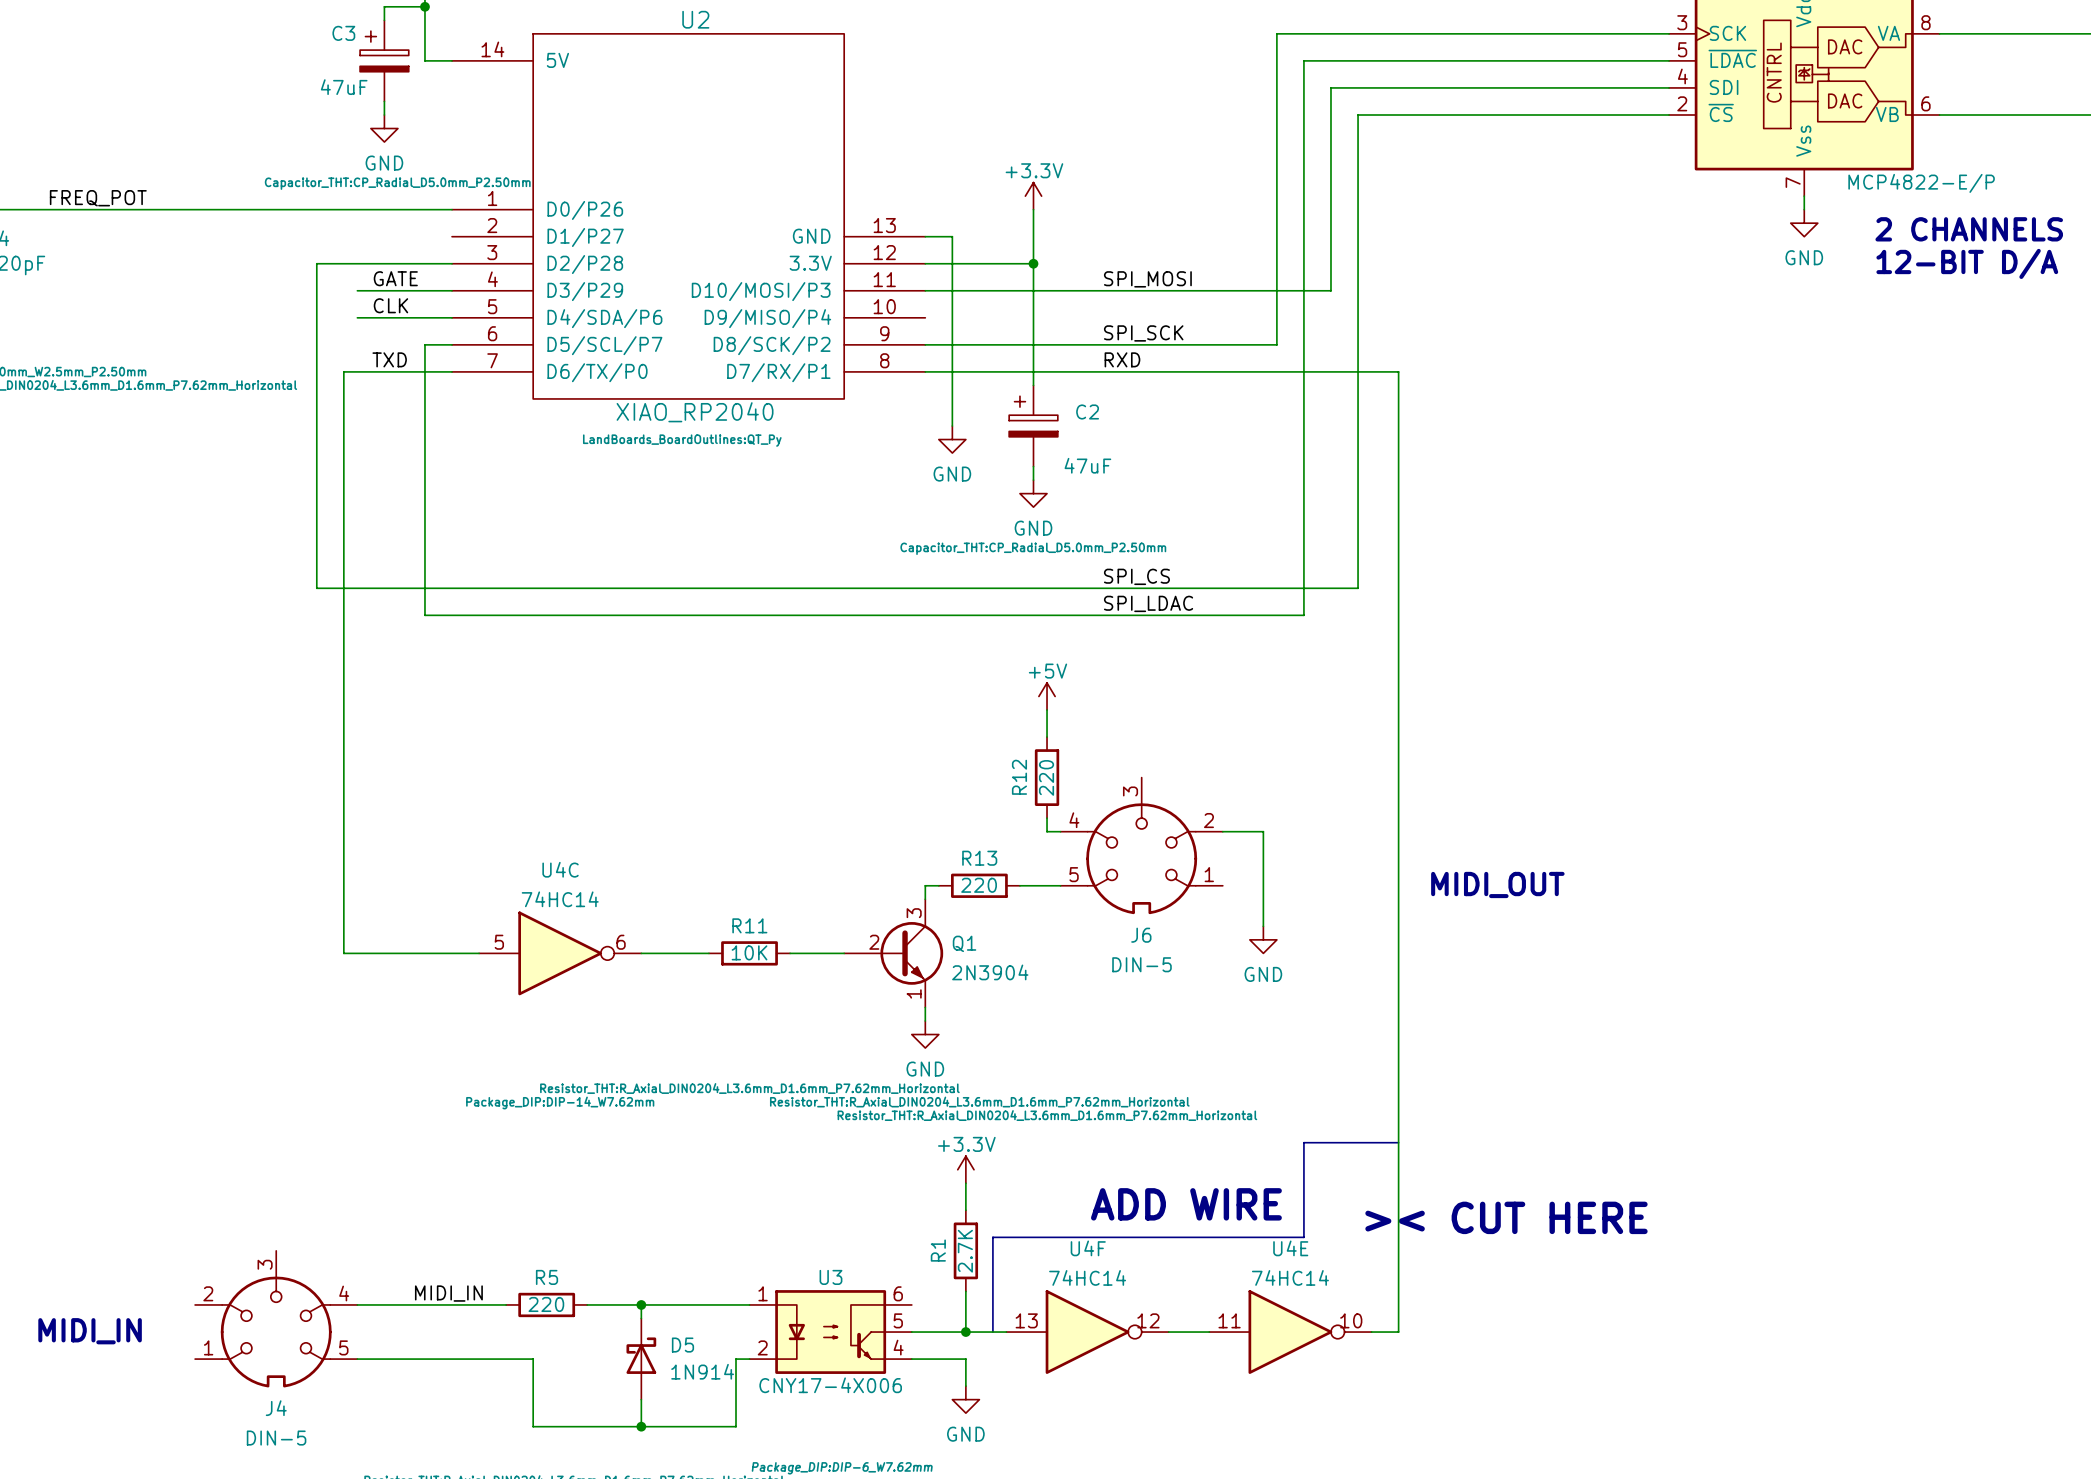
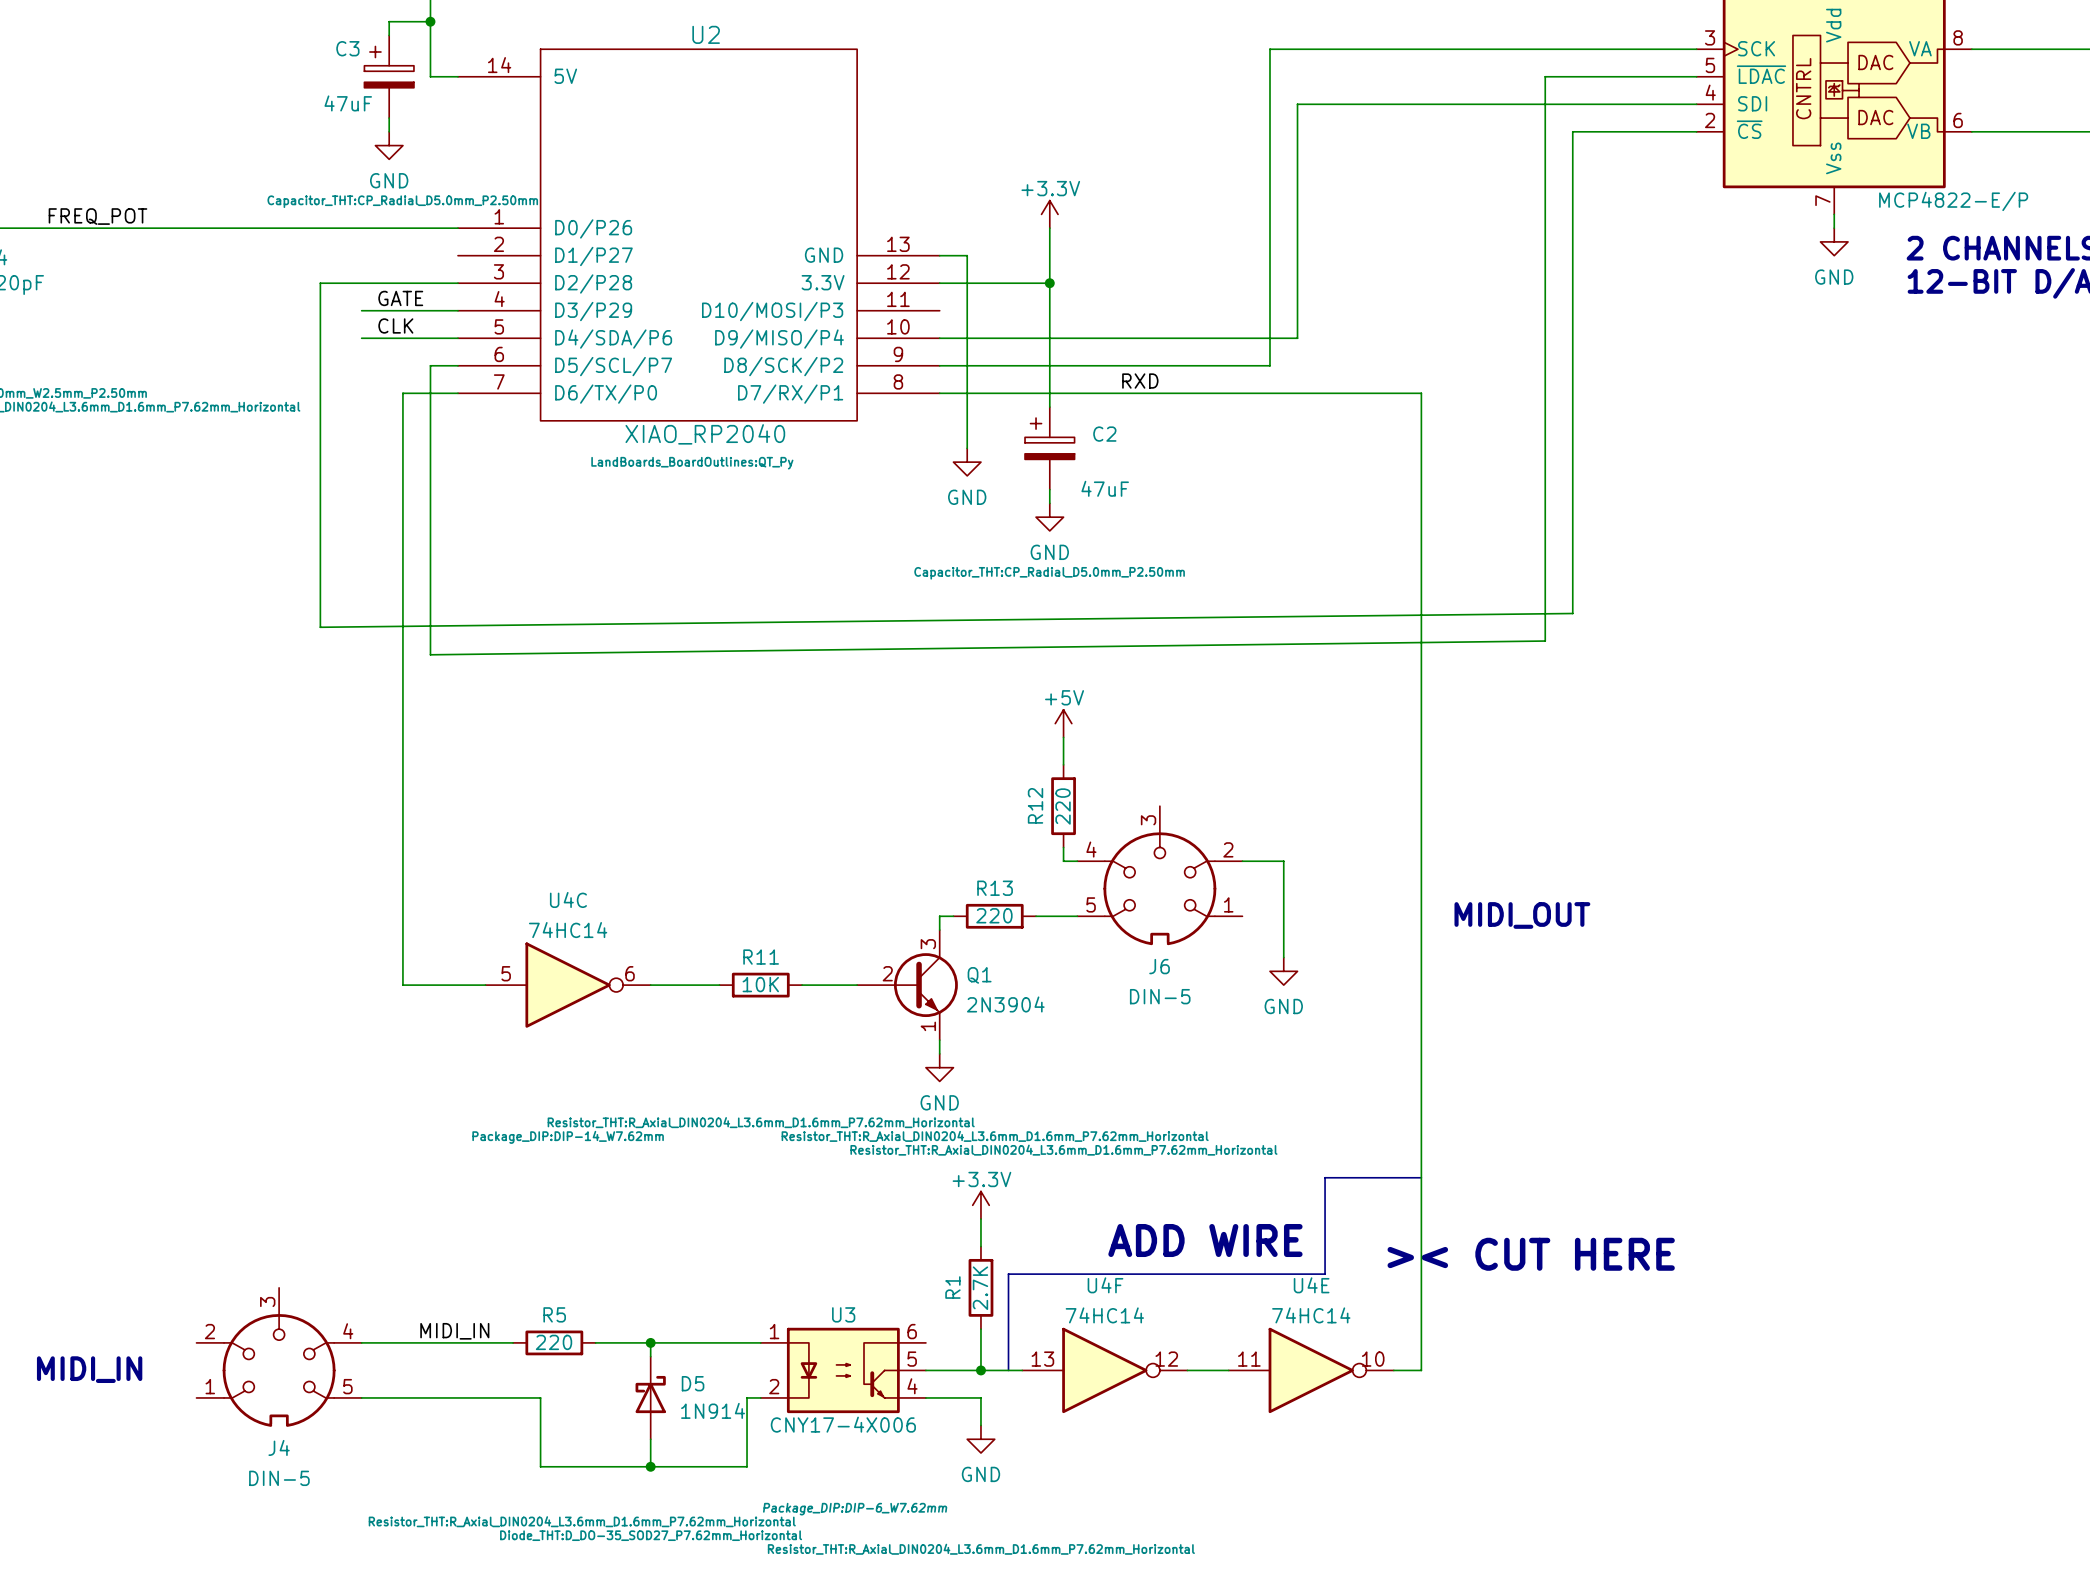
wire: (1276, 33) (1276, 87) -> (1352, 104) (1297, 104)
wire: (1520, 60) (1303, 60) (1303, 615) (424, 615) -> (1545, 76) (1545, 641) (430, 654) (430, 641)
wire: (1330, 87) (1330, 290) (925, 290) -> none
wire: (1547, 115) (1358, 115) (1358, 588) (316, 588) -> (1572, 131) (1572, 613) (320, 627) (320, 613)
label: SPI_MOSI (1147, 279) -> none
wire: none -> (939, 338) (1297, 338)
wire: (1276, 317) (1276, 344) (1249, 344) -> (1297, 49) (1269, 49) (1269, 365)
label: SPI_SCK (1143, 333) -> none
label: TXD (389, 359) -> none
wire: (397, 371) (343, 371) (343, 953) (397, 953) -> (402, 393) (402, 985)
label: SPI_CS (1136, 576) -> none
label: SPI_LDAC (1148, 603) -> none

